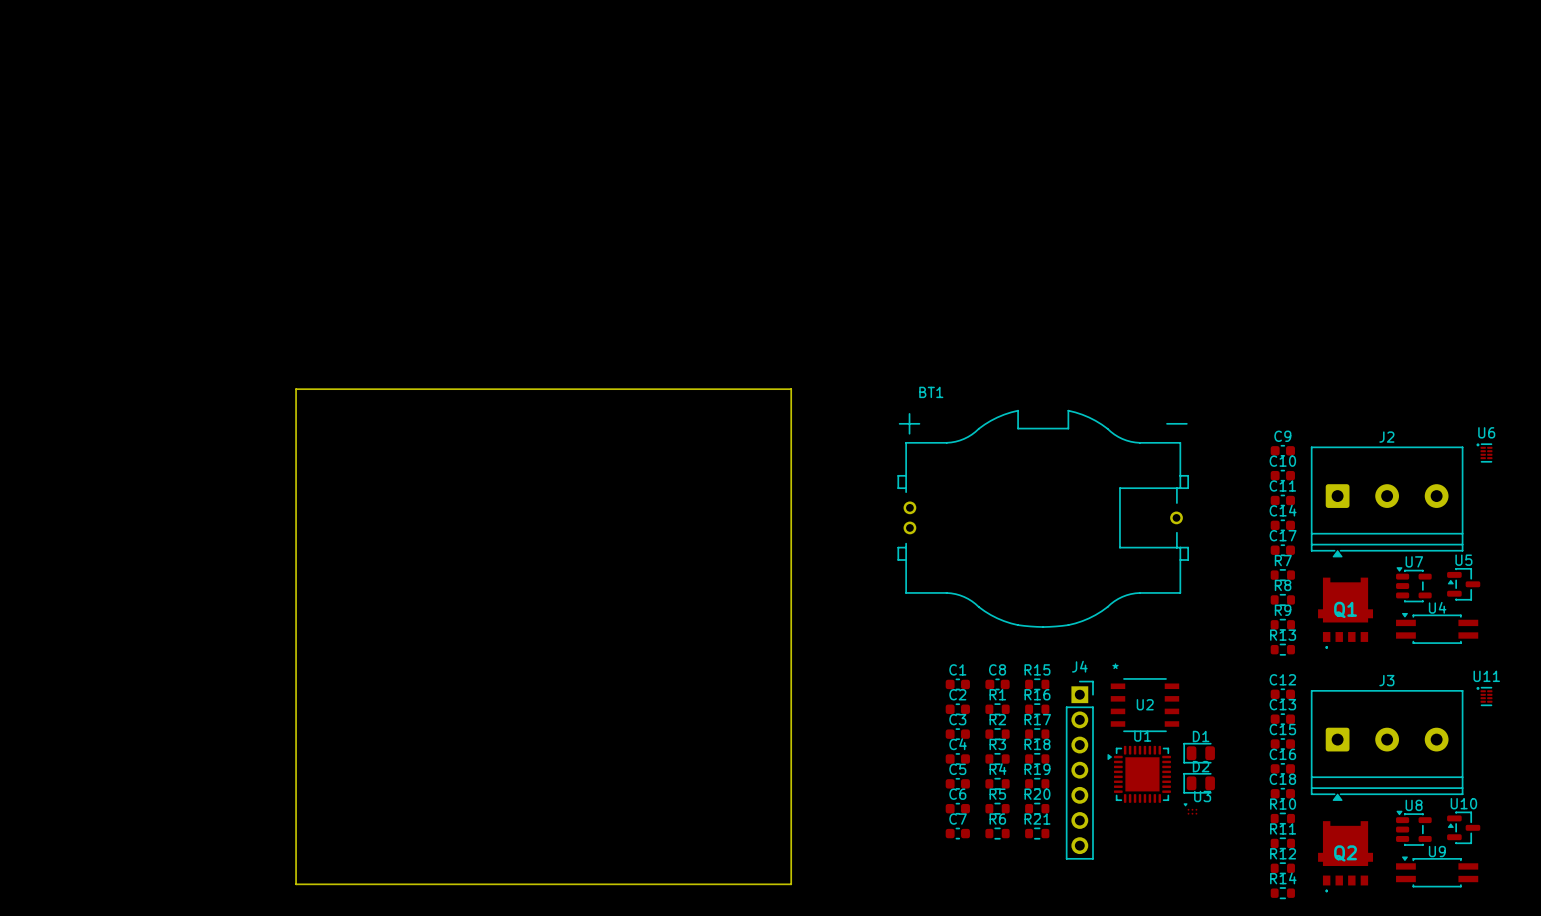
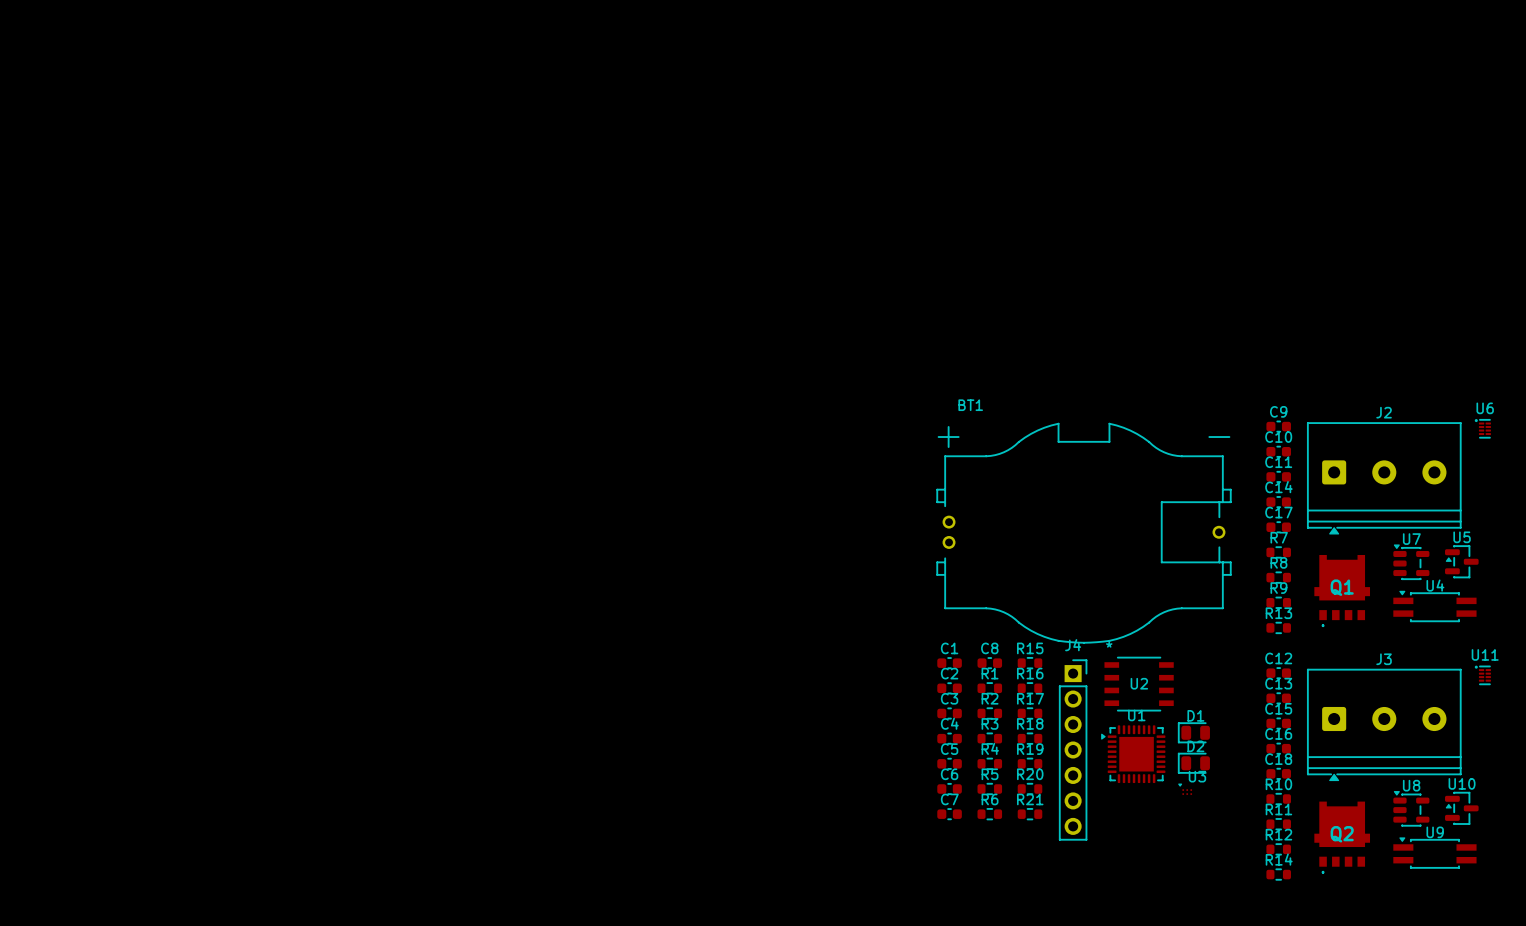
board edge: (296, 389) (791, 389) (791, 884) (296, 884) (296, 389) -> none
BT1 position: (1043, 518) -> (1084, 533)

